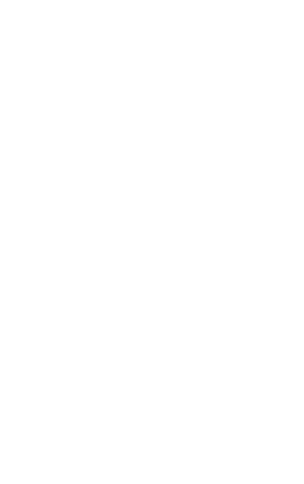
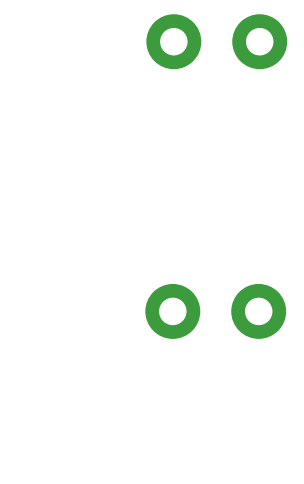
part: none -> (216, 41)
part: none -> (215, 311)

